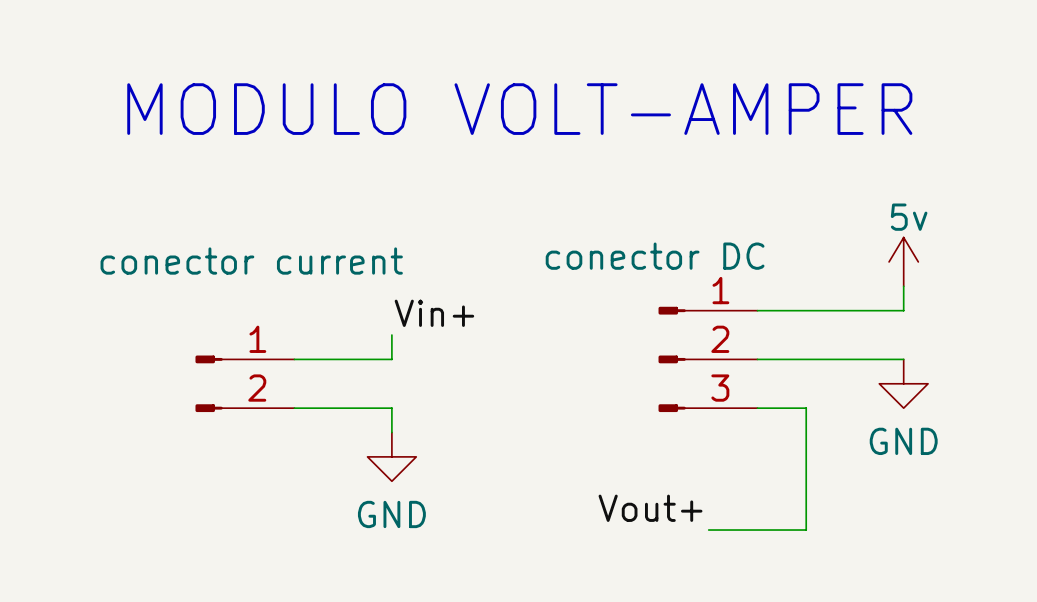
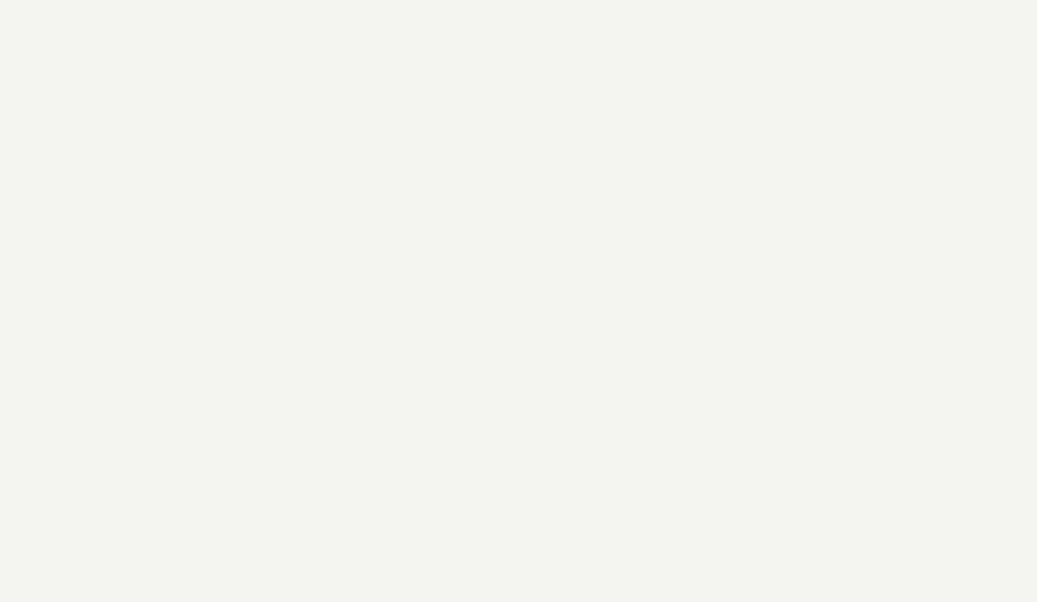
text: MODULO VOLT-AMPER (519, 109) -> none
power symbol: 5v (903, 261) -> none
wire: (903, 286) (903, 310) (757, 310) -> none
label: Vin+ (434, 313) -> none
wire: (391, 335) (391, 359) (294, 359) -> none
part: conector DC (707, 359) -> none
wire: (757, 359) (903, 359) -> none
part: conector current (244, 383) -> none
power symbol: GND (903, 383) -> none
wire: (294, 408) (391, 408) (391, 432) -> none
wire: (757, 408) (806, 408) (806, 530) (708, 530) -> none
power symbol: GND (391, 456) -> none
label: Vout+ (650, 508) -> none

